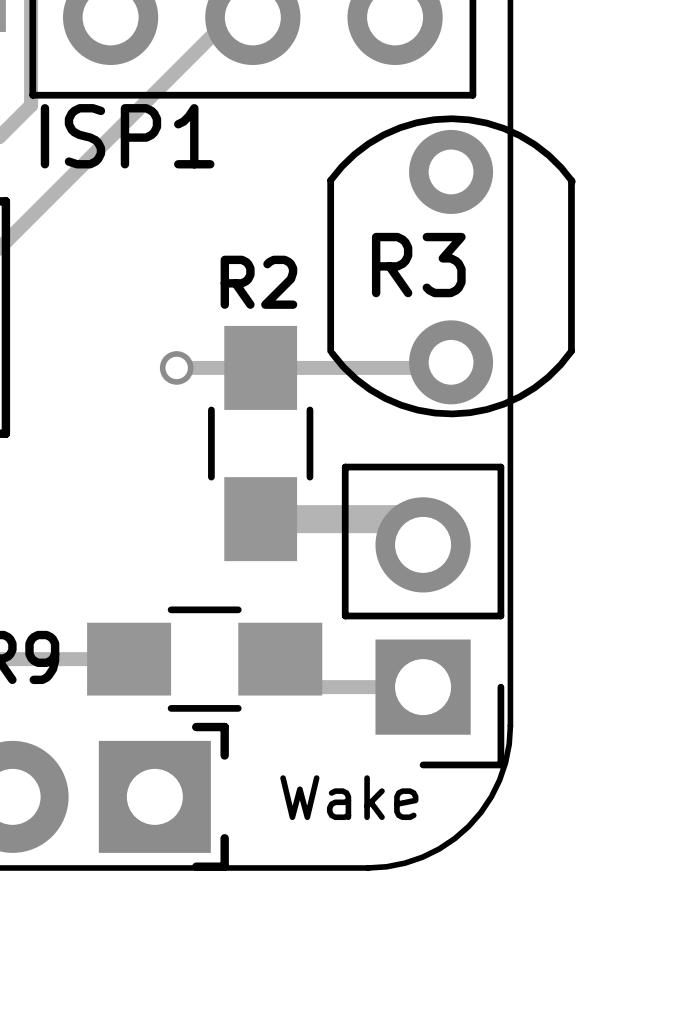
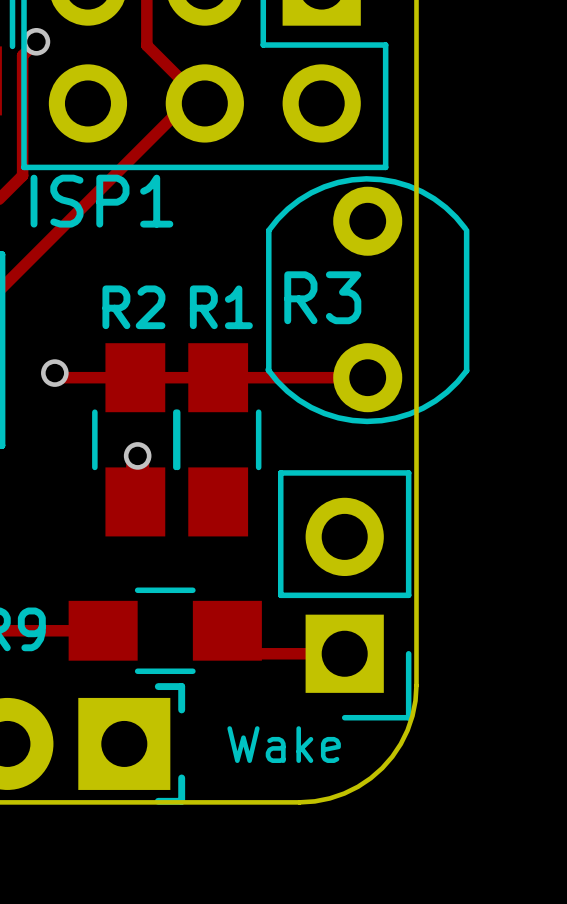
R3 rotation: 0° (451, 266) -> 180° (367, 300)
track: none -> (54, 373) (59, 377) (367, 377)
via: none -> (54, 373)
track: (176, 367) (424, 367) (438, 381) (451, 381) -> none
via: (176, 367) -> none
R1: none -> (218, 439)
R2 position: (260, 443) -> (135, 439)
via: none -> (137, 455)
track: (260, 519) (397, 519) (423, 544) -> none

